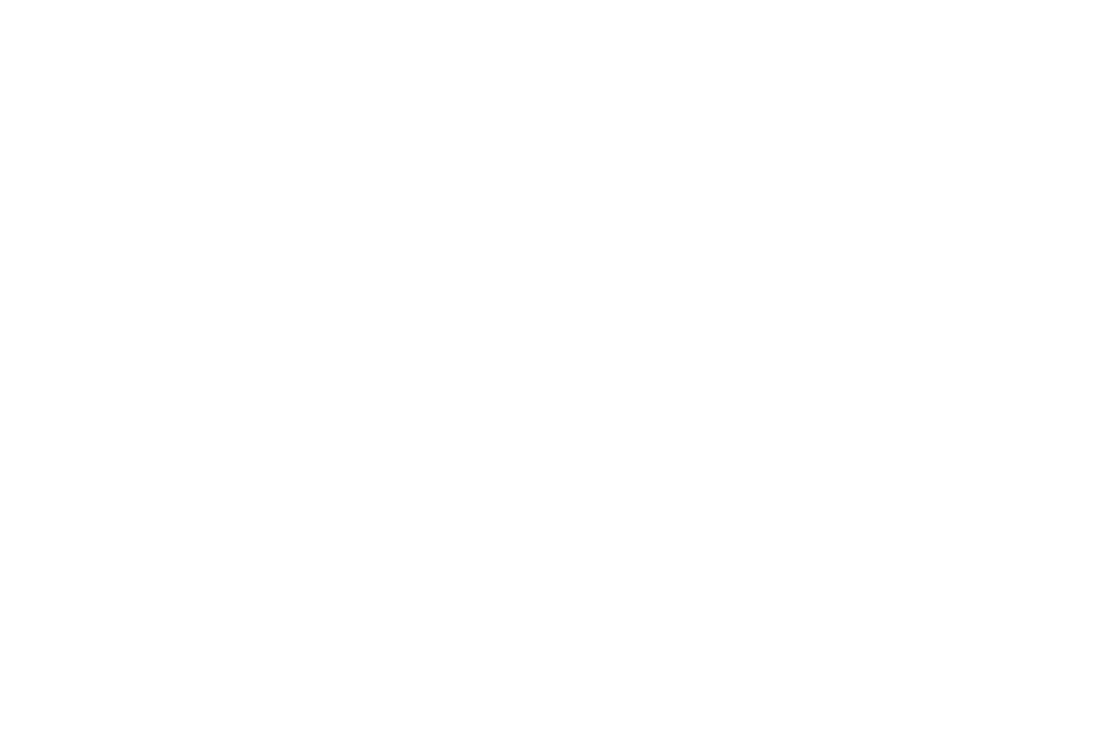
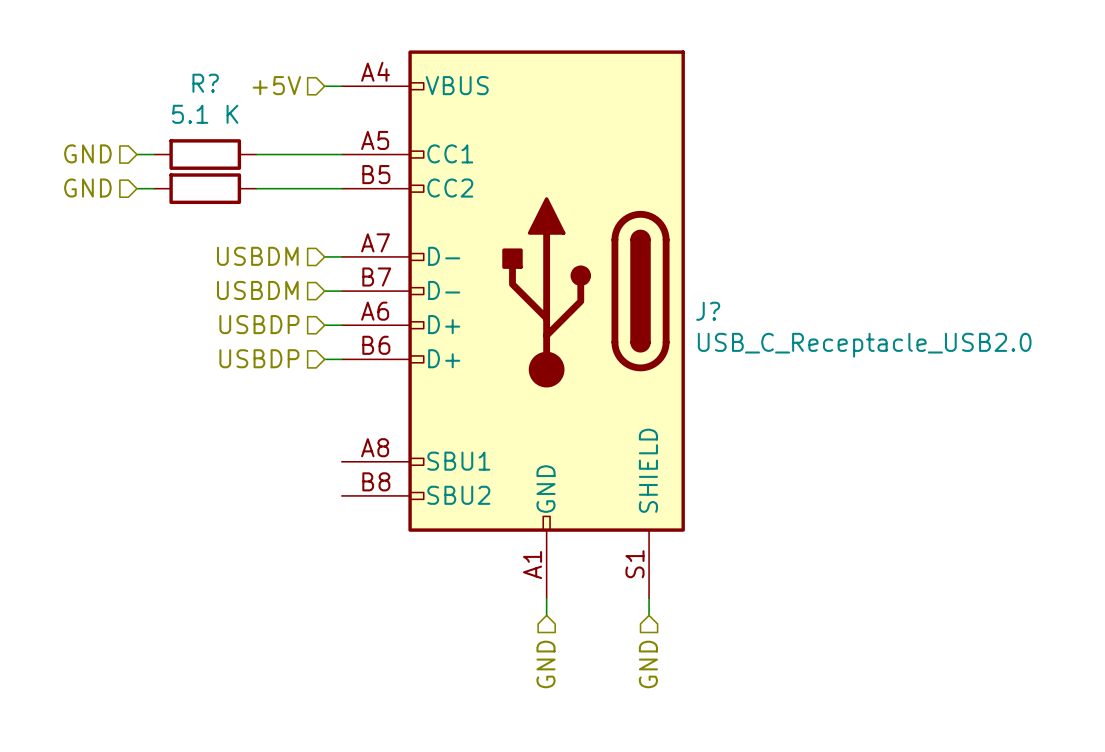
hierarchical label: none -> +5V (276, 85)
wire: none -> (324, 86) (341, 86)
hierarchical label: none -> GND (87, 153)
wire: none -> (136, 154) (154, 154)
R?: none -> 5.1 K (205, 154)
wire: none -> (256, 154) (341, 154)
hierarchical label: none -> GND (87, 188)
wire: none -> (136, 188) (154, 188)
part: none -> (205, 188)
wire: none -> (256, 188) (341, 188)
hierarchical label: none -> USBDM (257, 256)
wire: none -> (324, 256) (341, 256)
hierarchical label: none -> USBDM (257, 290)
wire: none -> (324, 291) (341, 291)
hierarchical label: none -> USBDP (259, 324)
J?: none -> USB_C_Receptacle_USB2.0 (513, 324)
wire: none -> (324, 325) (341, 325)
hierarchical label: none -> USBDP (259, 358)
wire: none -> (324, 359) (341, 359)
wire: none -> (546, 598) (546, 615)
wire: none -> (649, 598) (649, 615)
hierarchical label: none -> GND (545, 664)
hierarchical label: none -> GND (648, 664)

